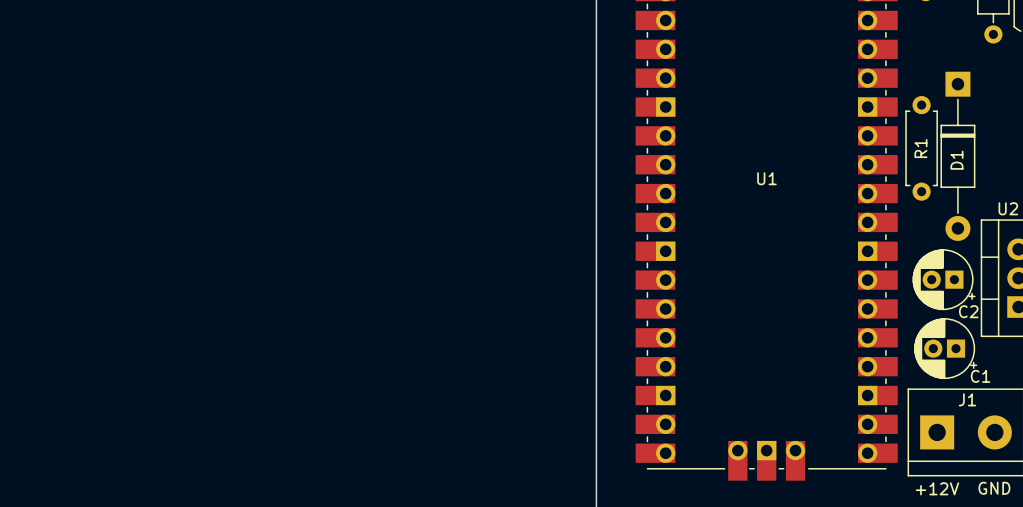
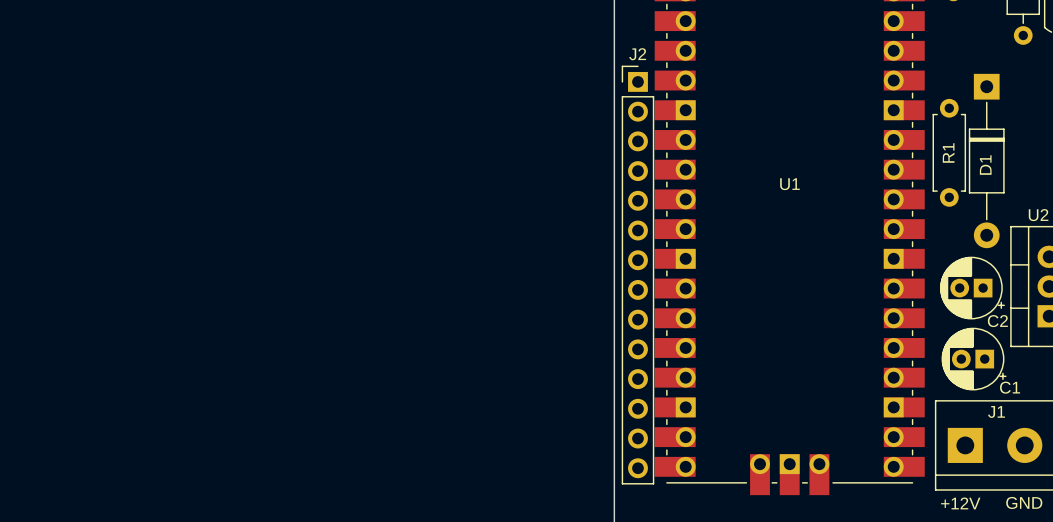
J2: none -> (637, 275)

